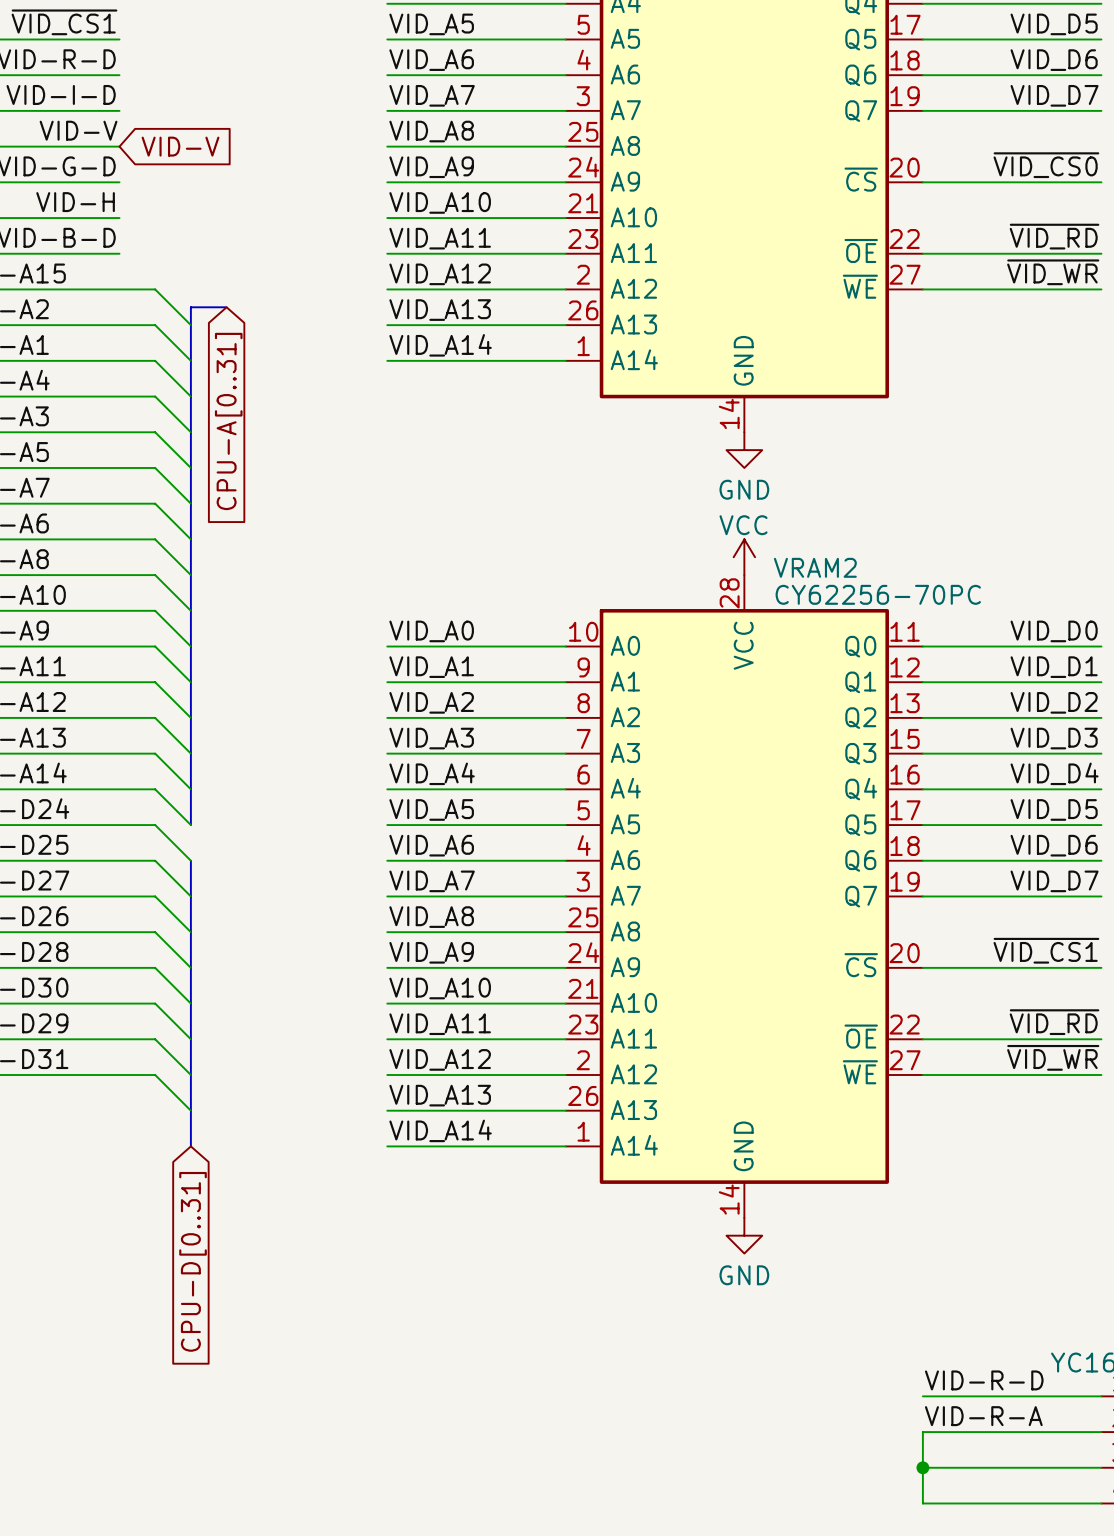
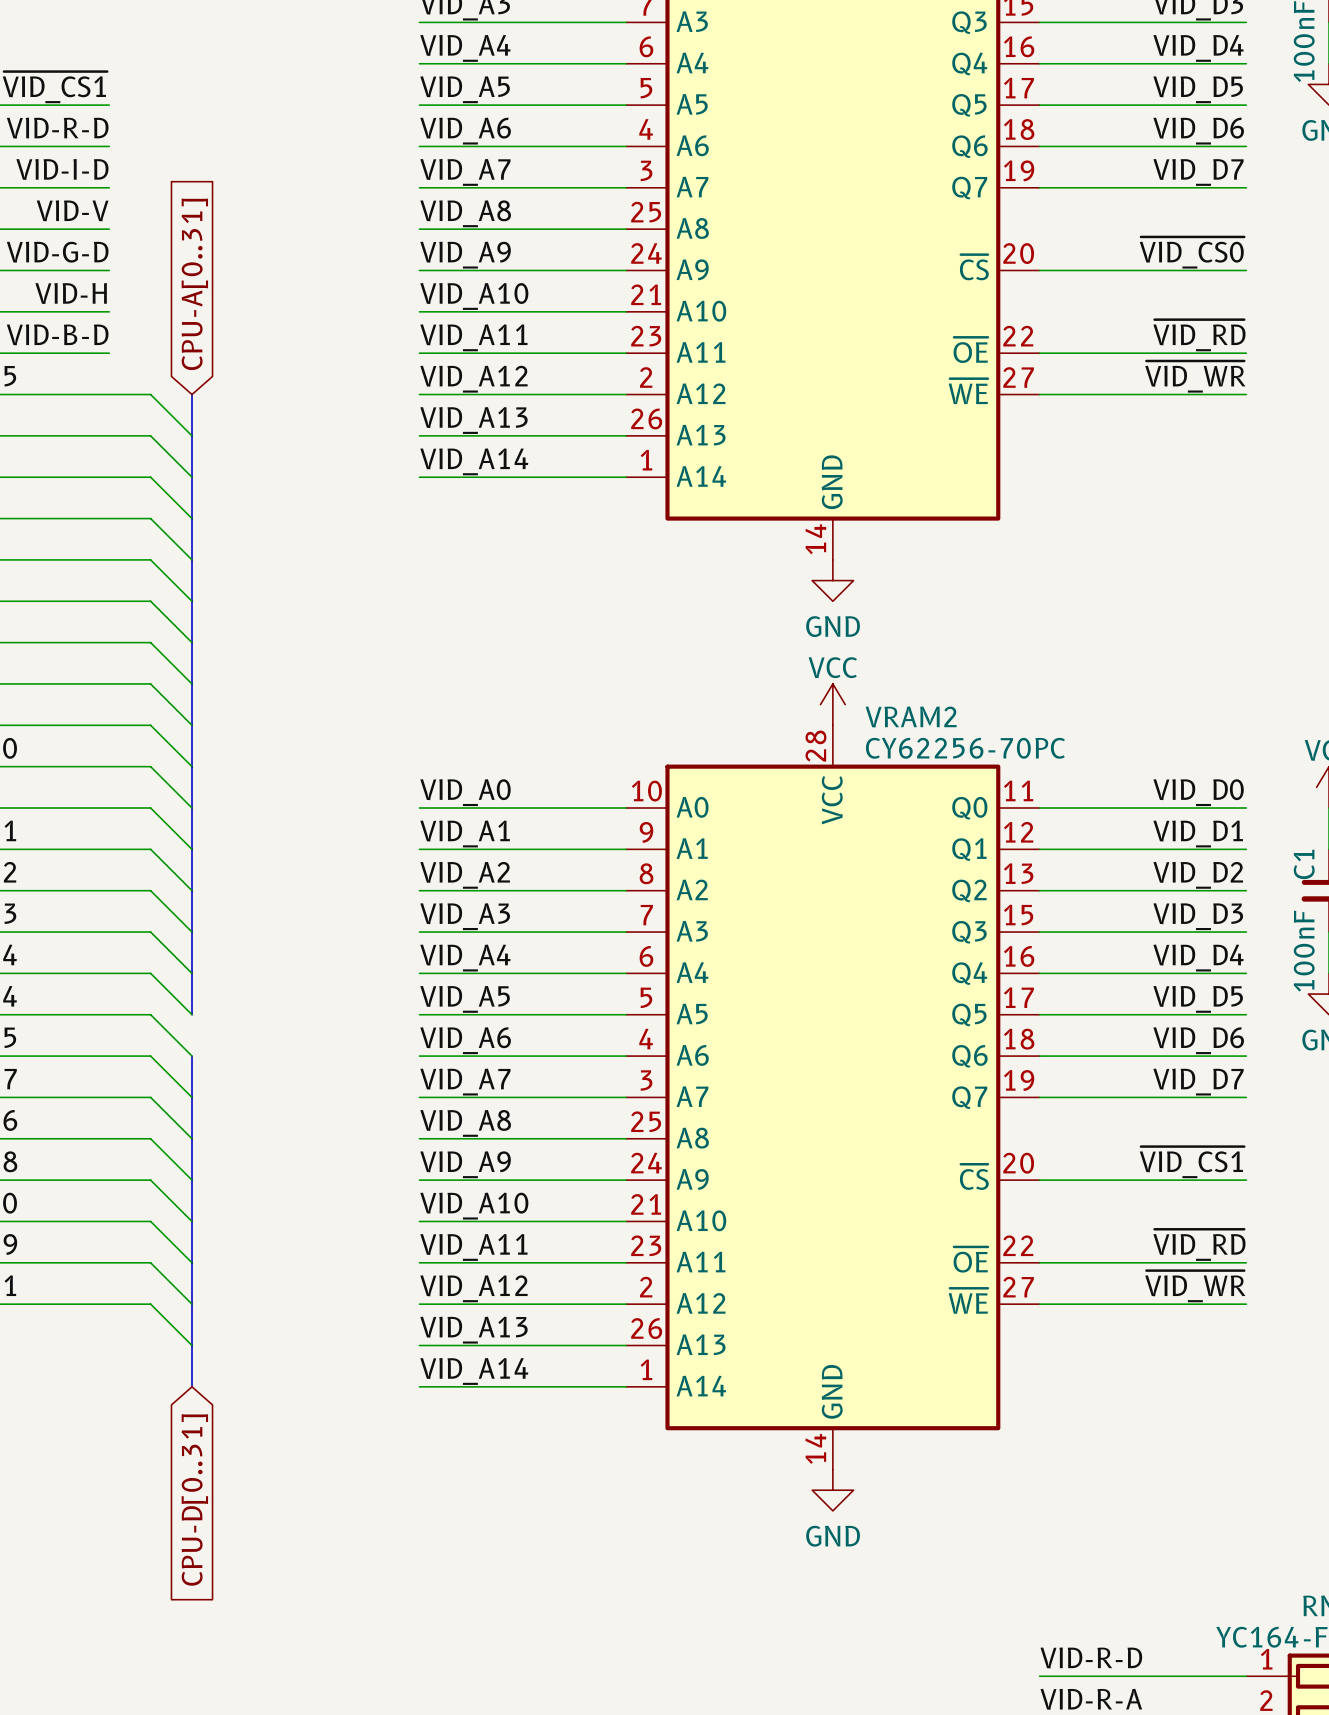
global label: VID-V (180, 146) -> none
bus: (190, 307) (226, 307) -> (192, 415) (192, 394)
global label rotation: 0° (228, 421) -> 180° (194, 284)
global label position: CPU-A[0..31] (228, 421) -> CPU-A[0..31] (194, 284)

